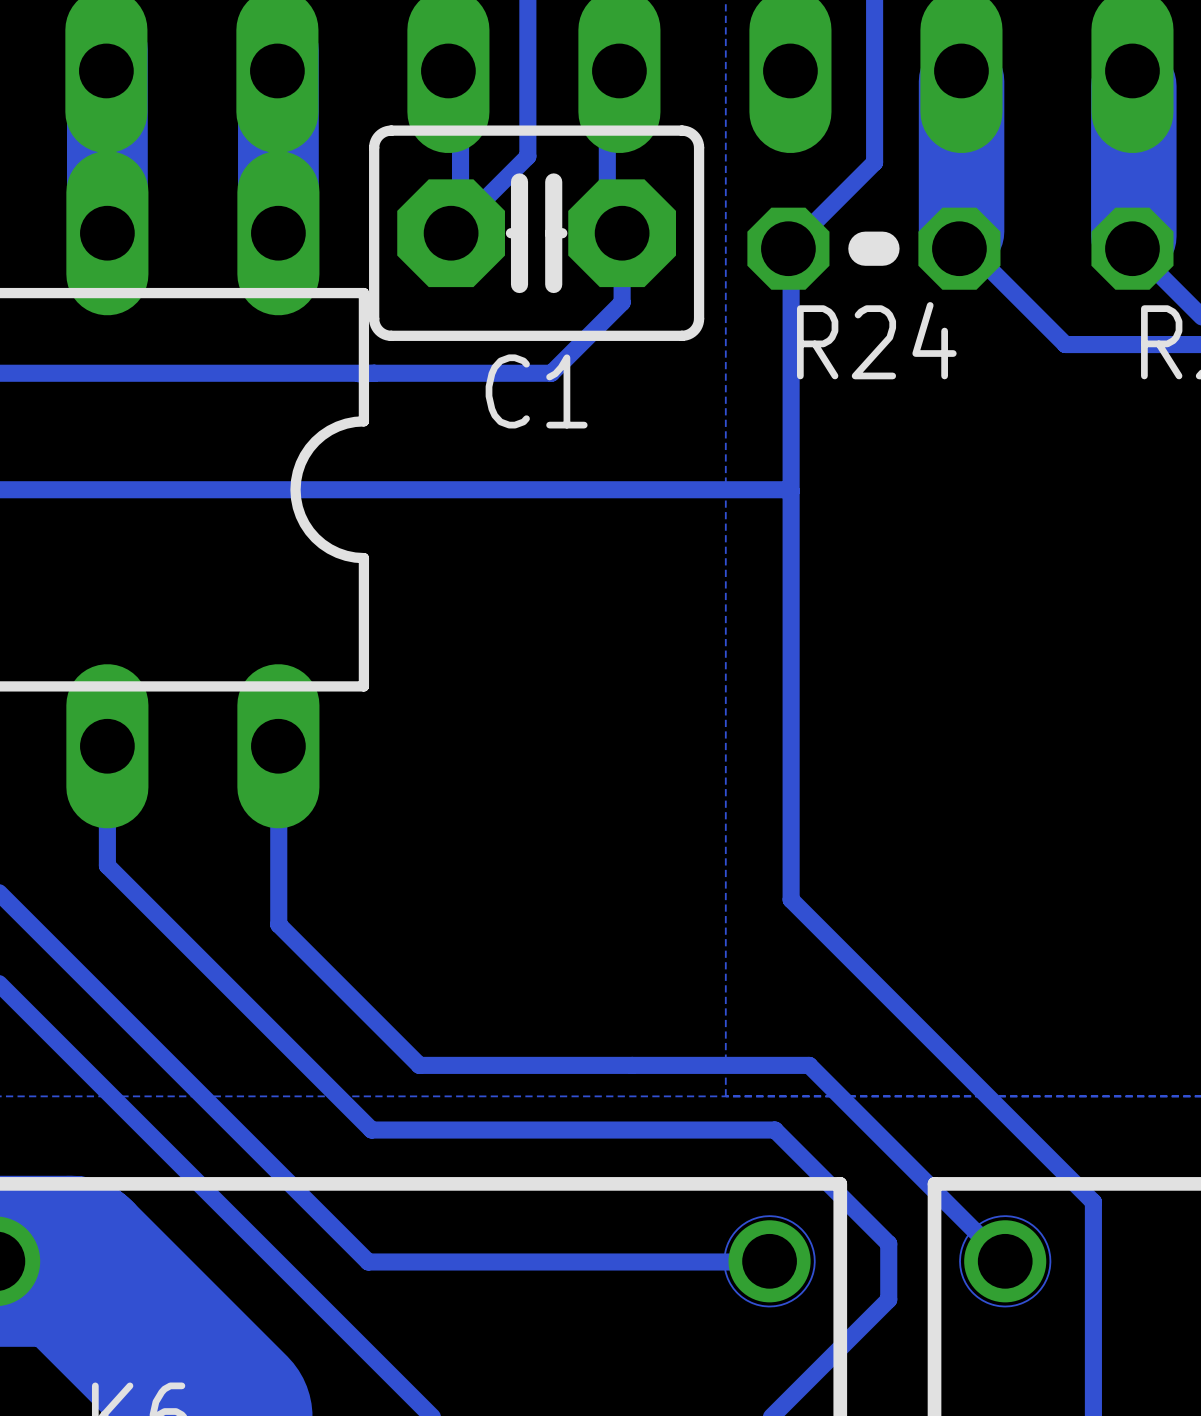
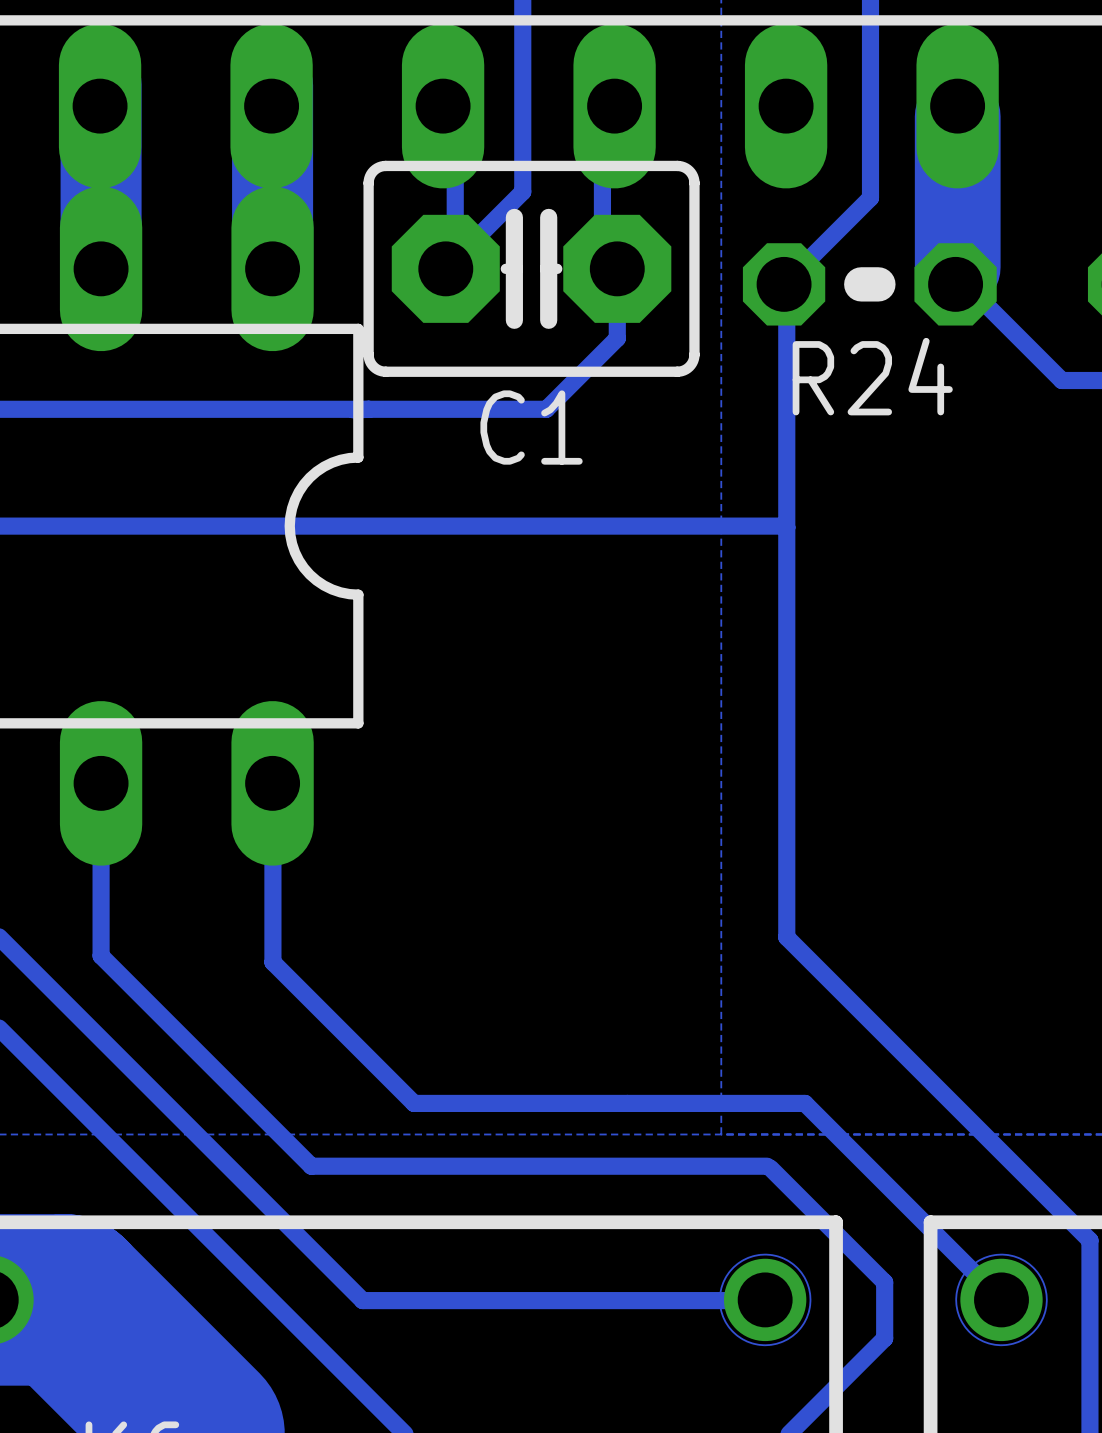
bottom track: (107, 865) (371, 1130) (774, 1130) -> (101, 903) (101, 955) (311, 1166) (767, 1166)

